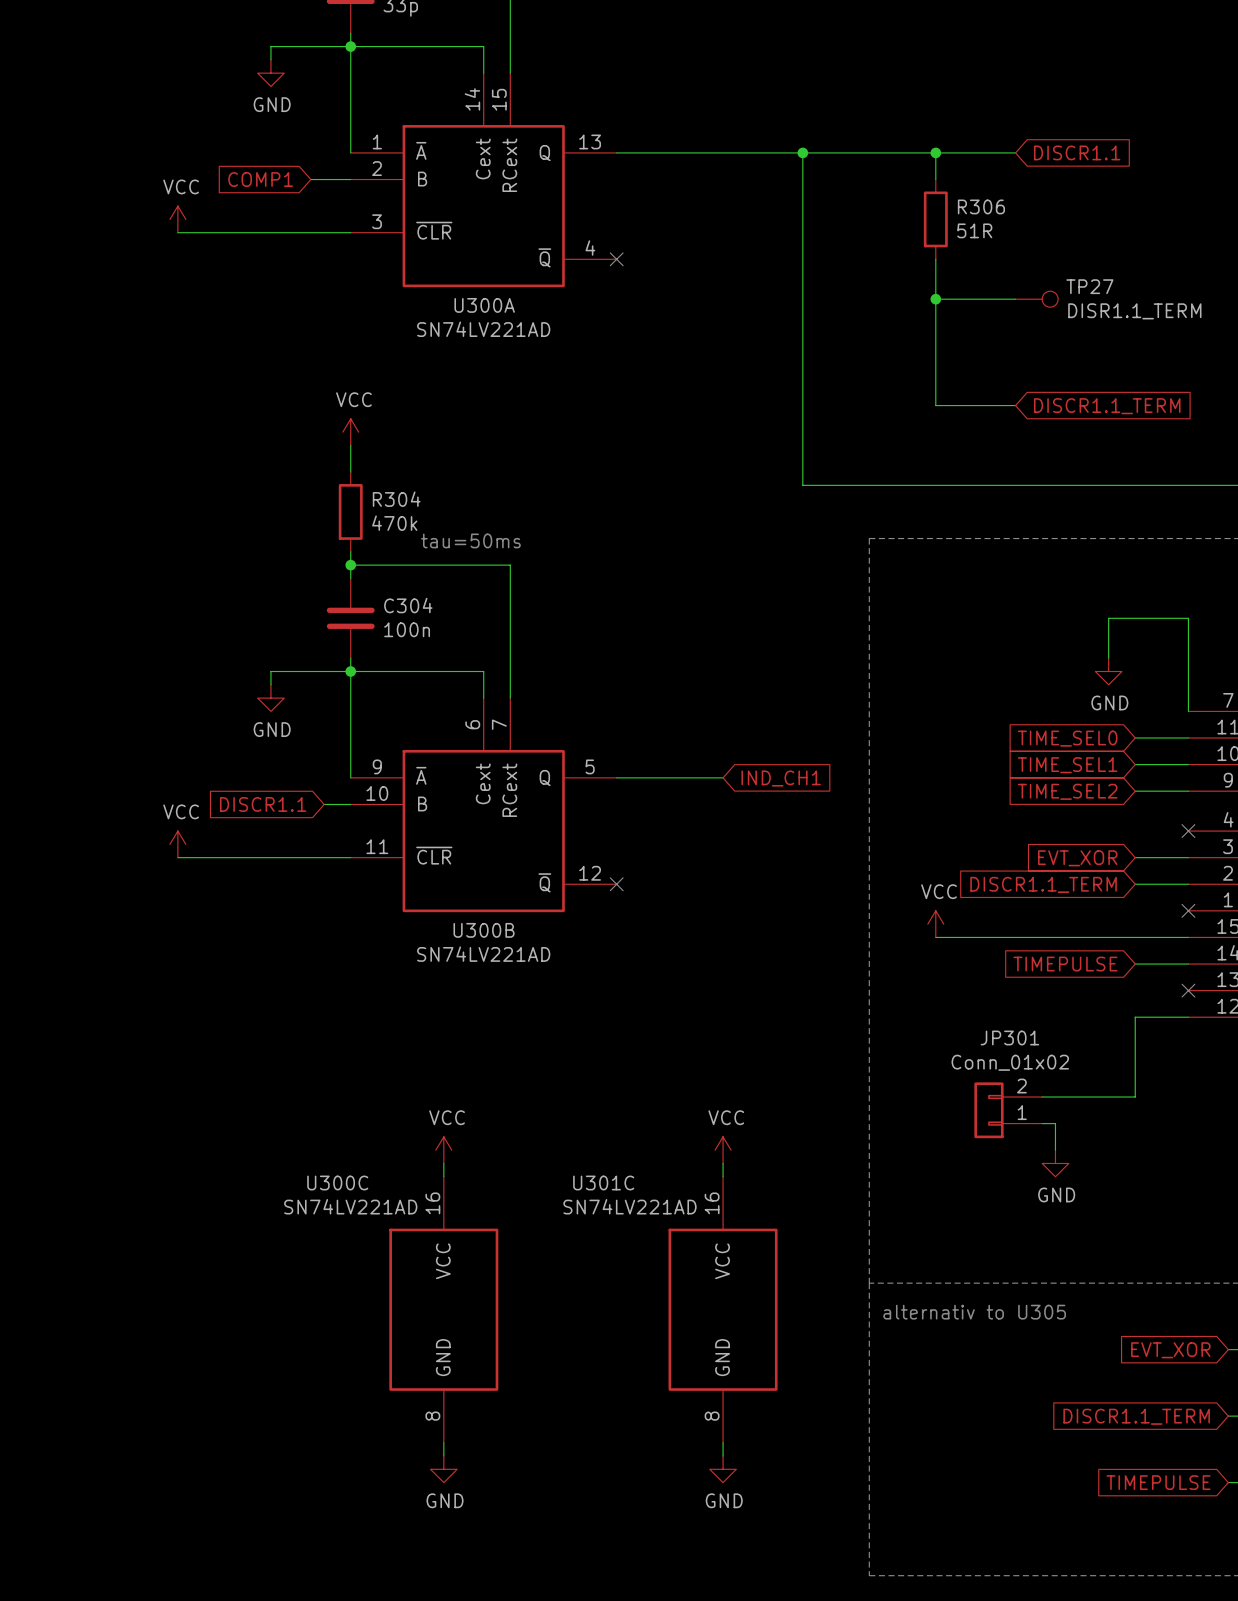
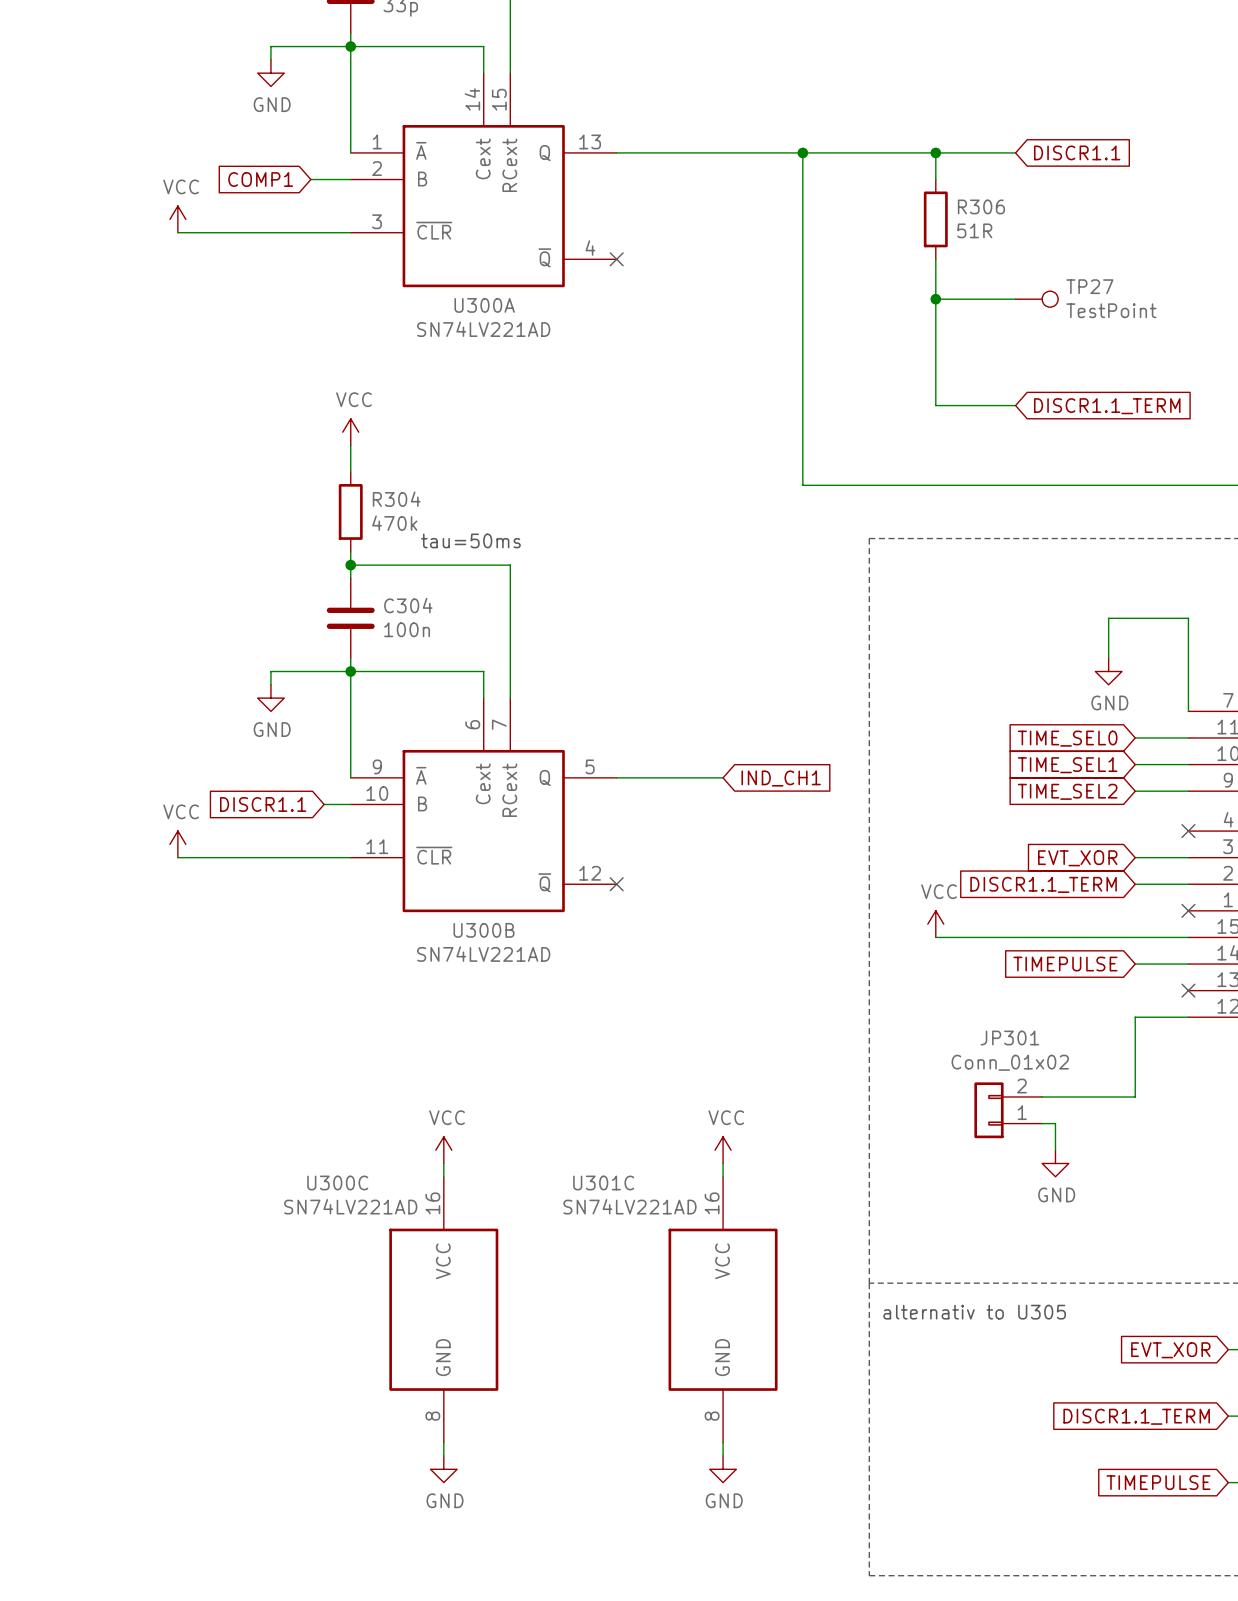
TP27 value: DISR1.1_TERM (1134, 311) -> TestPoint (1111, 310)

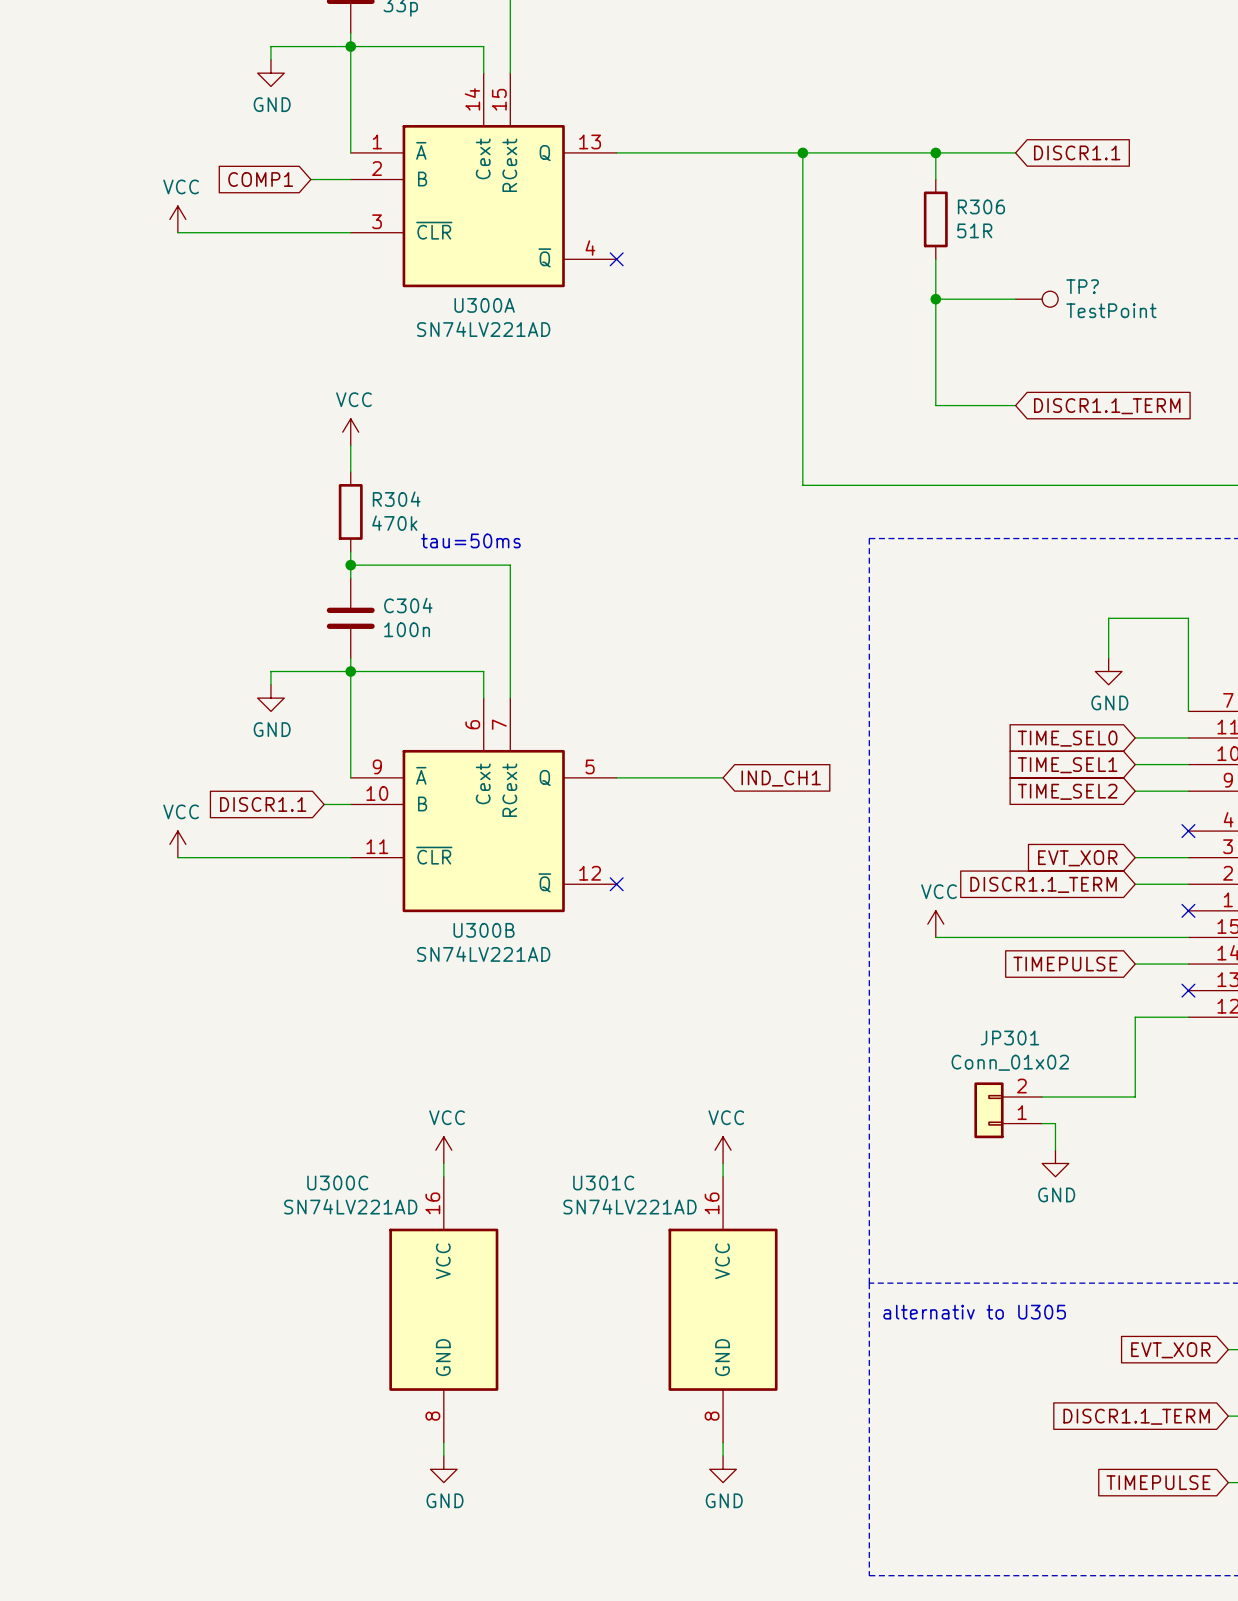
TP27 name: TP27 (1089, 286) -> TP? (1082, 286)

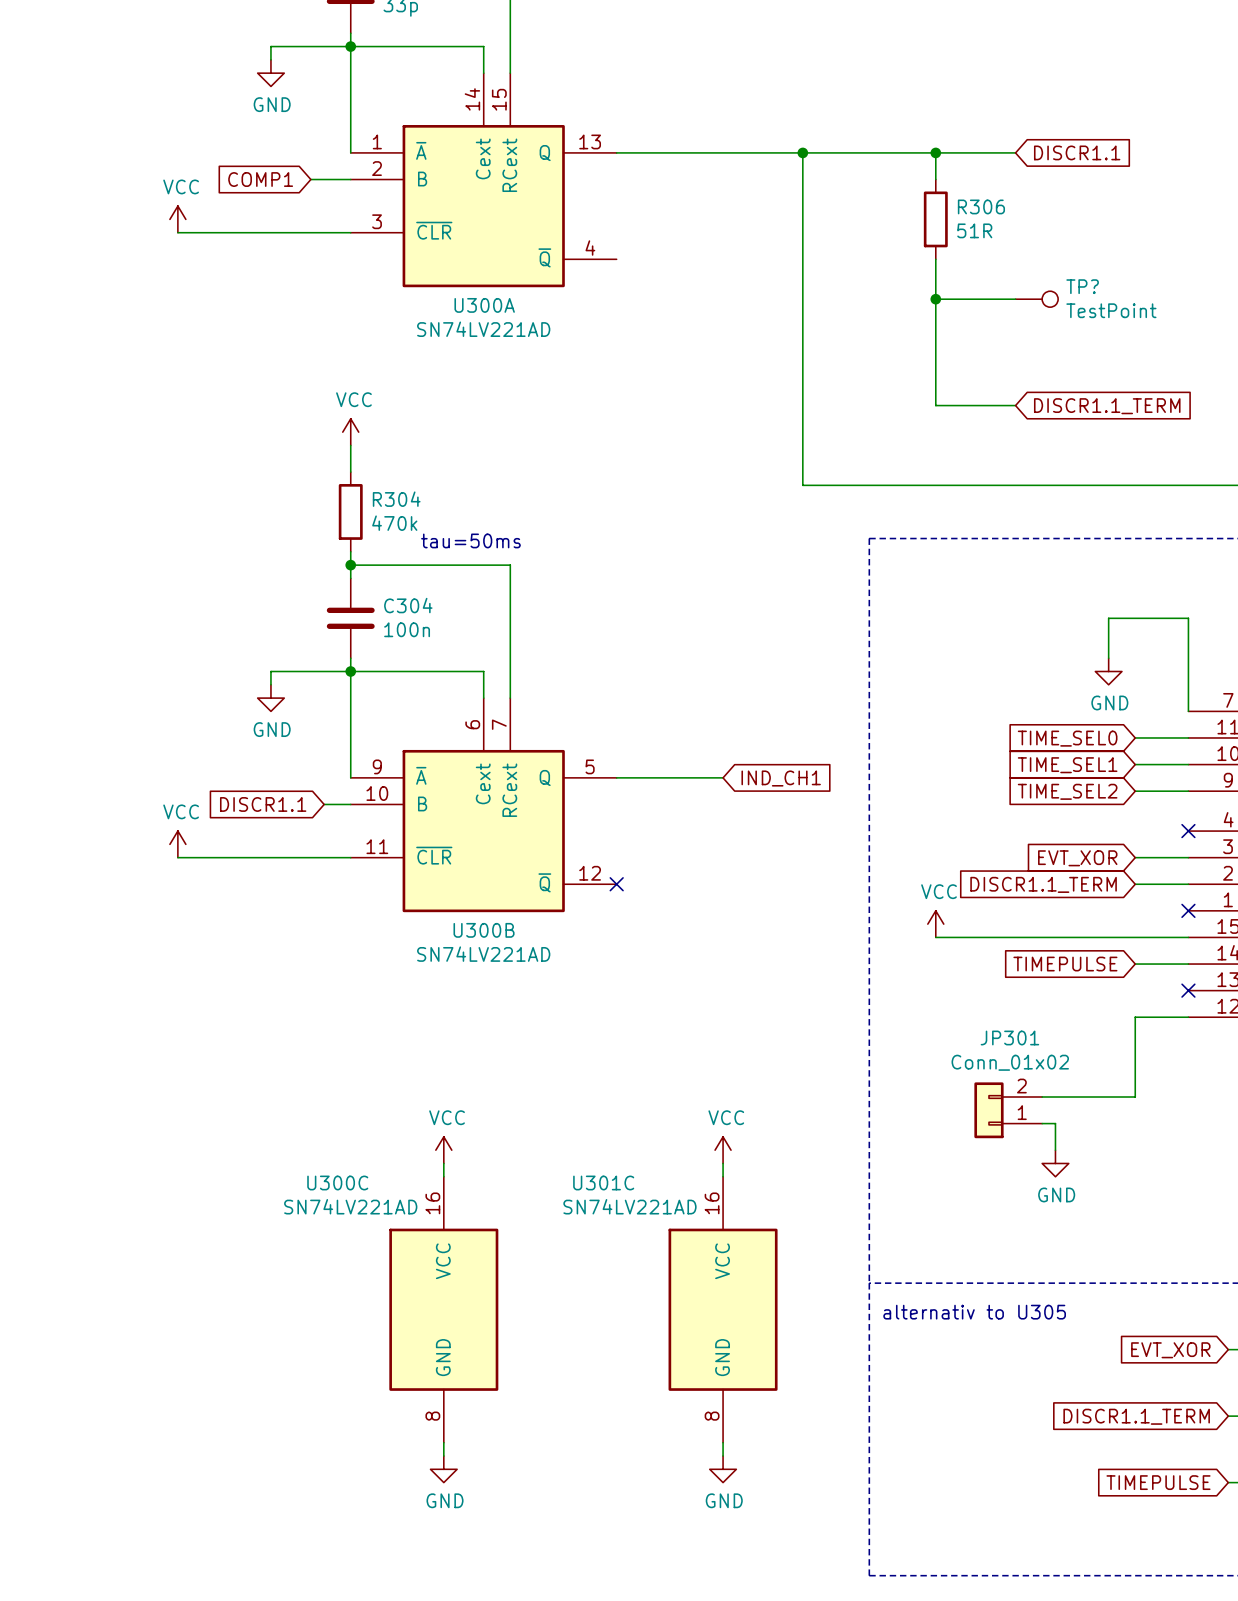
no-connect mark: (616, 259) -> none

